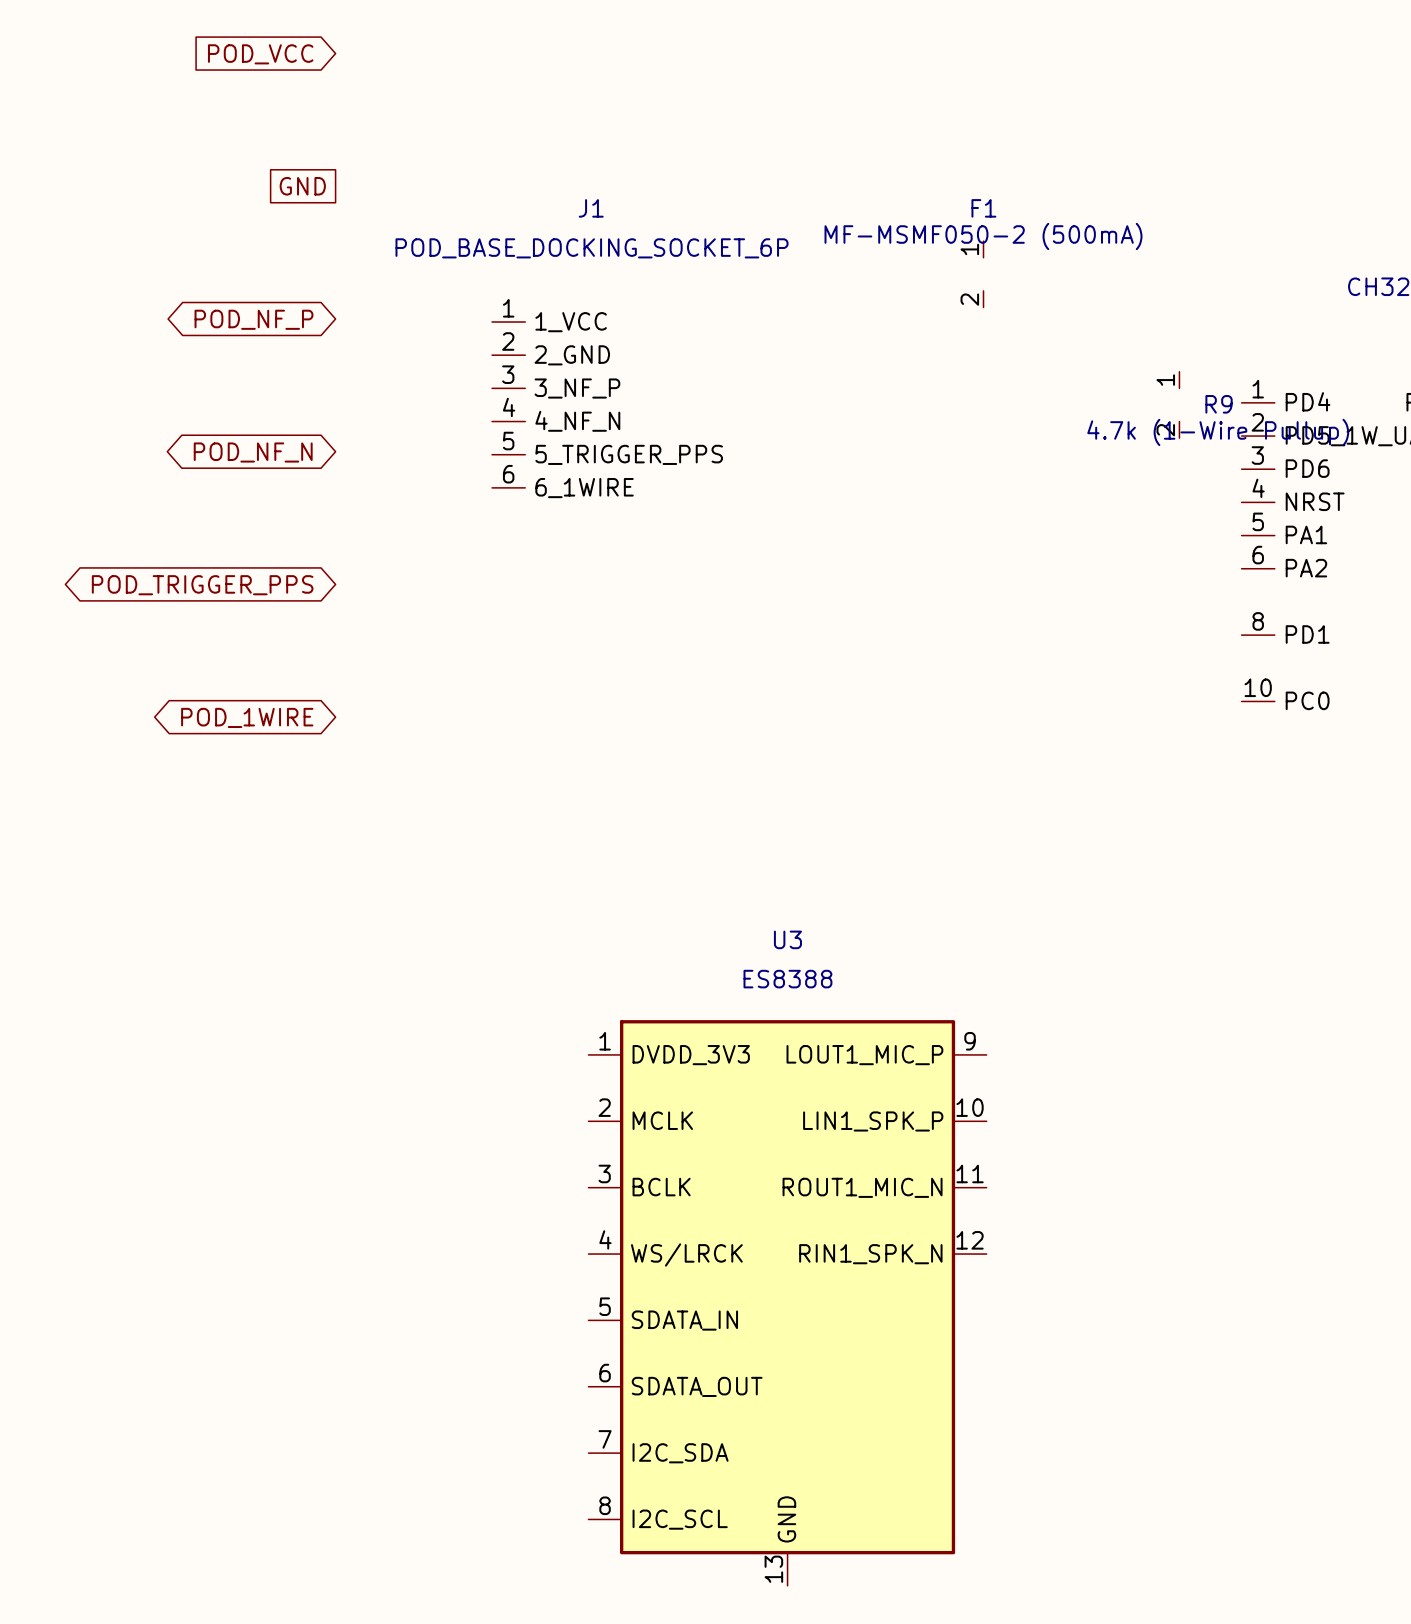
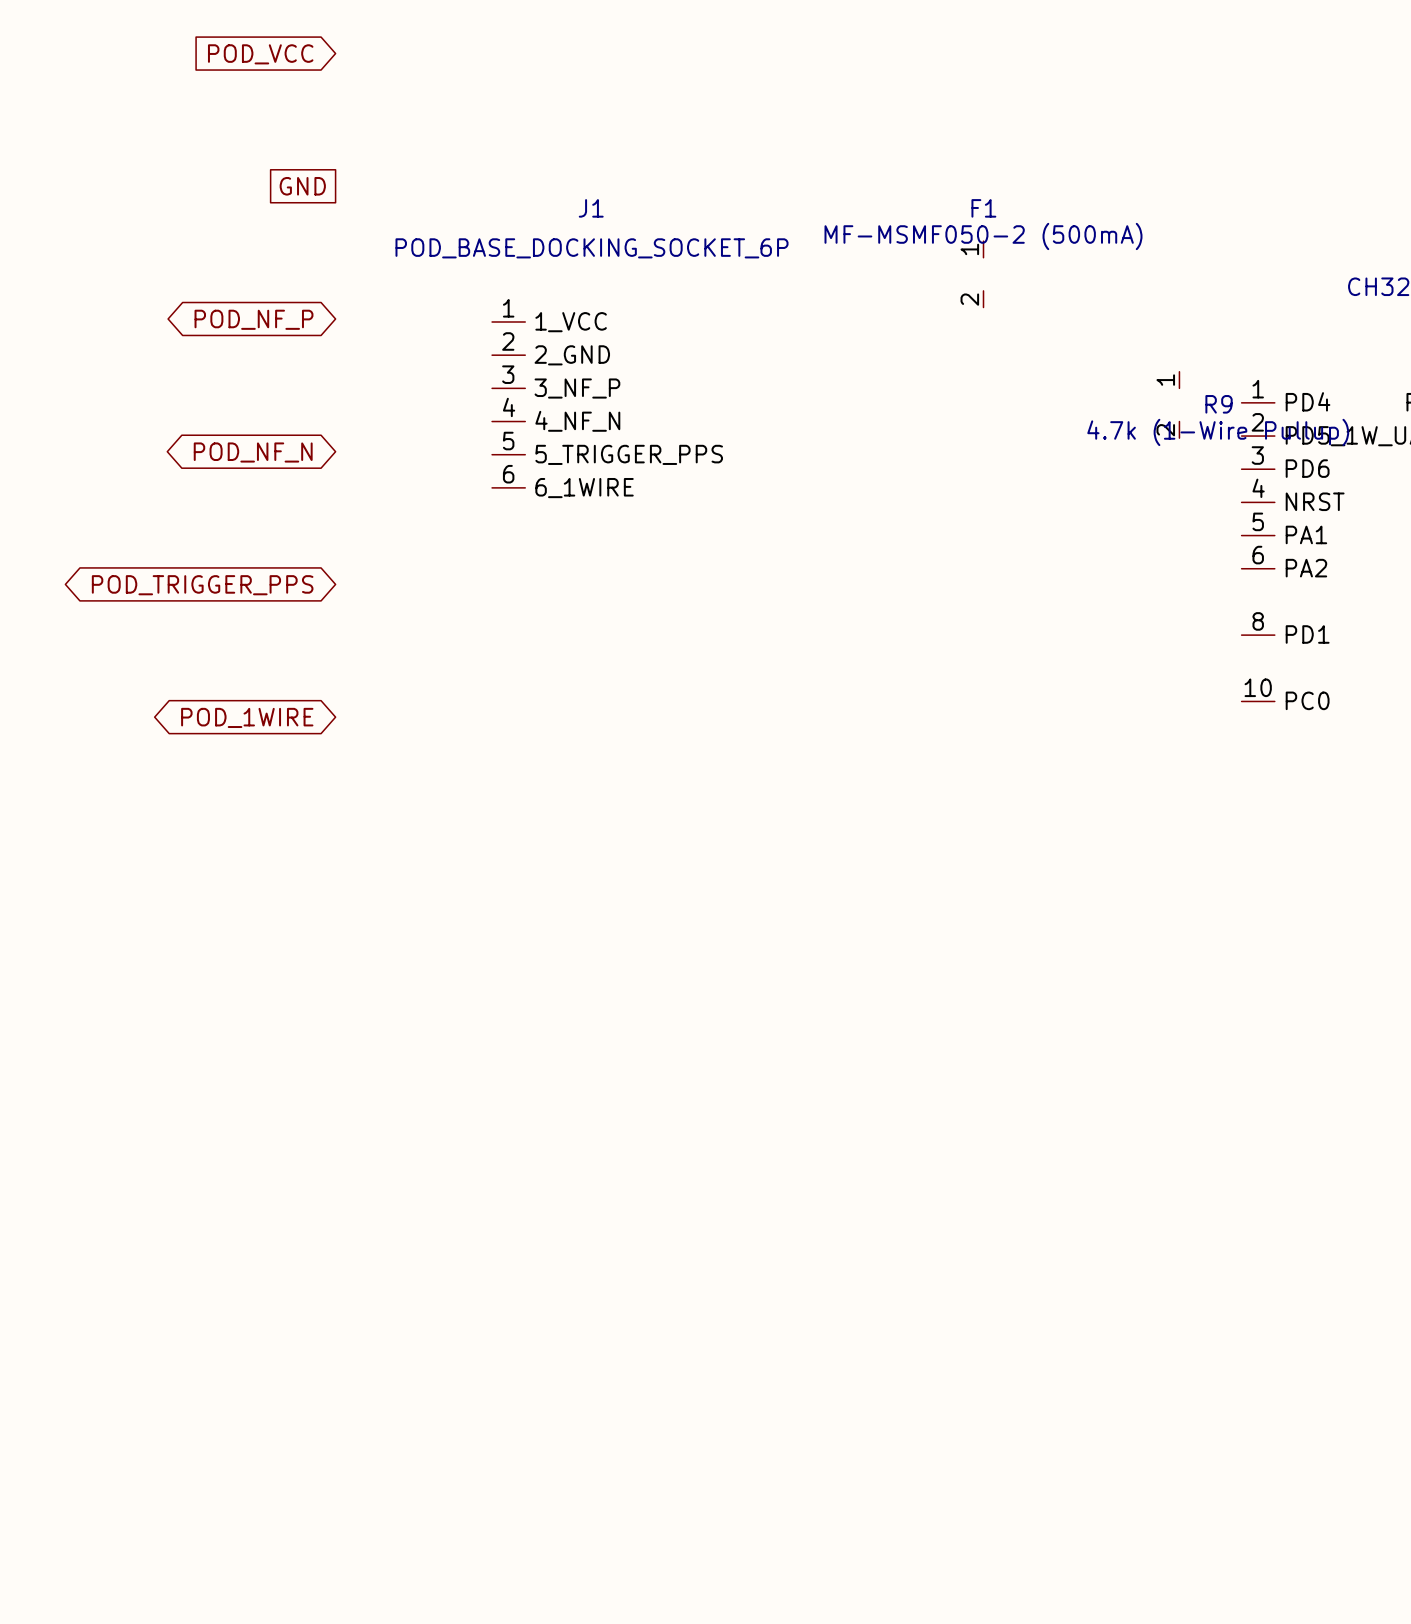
U3: ES8388 (787, 1302) -> none

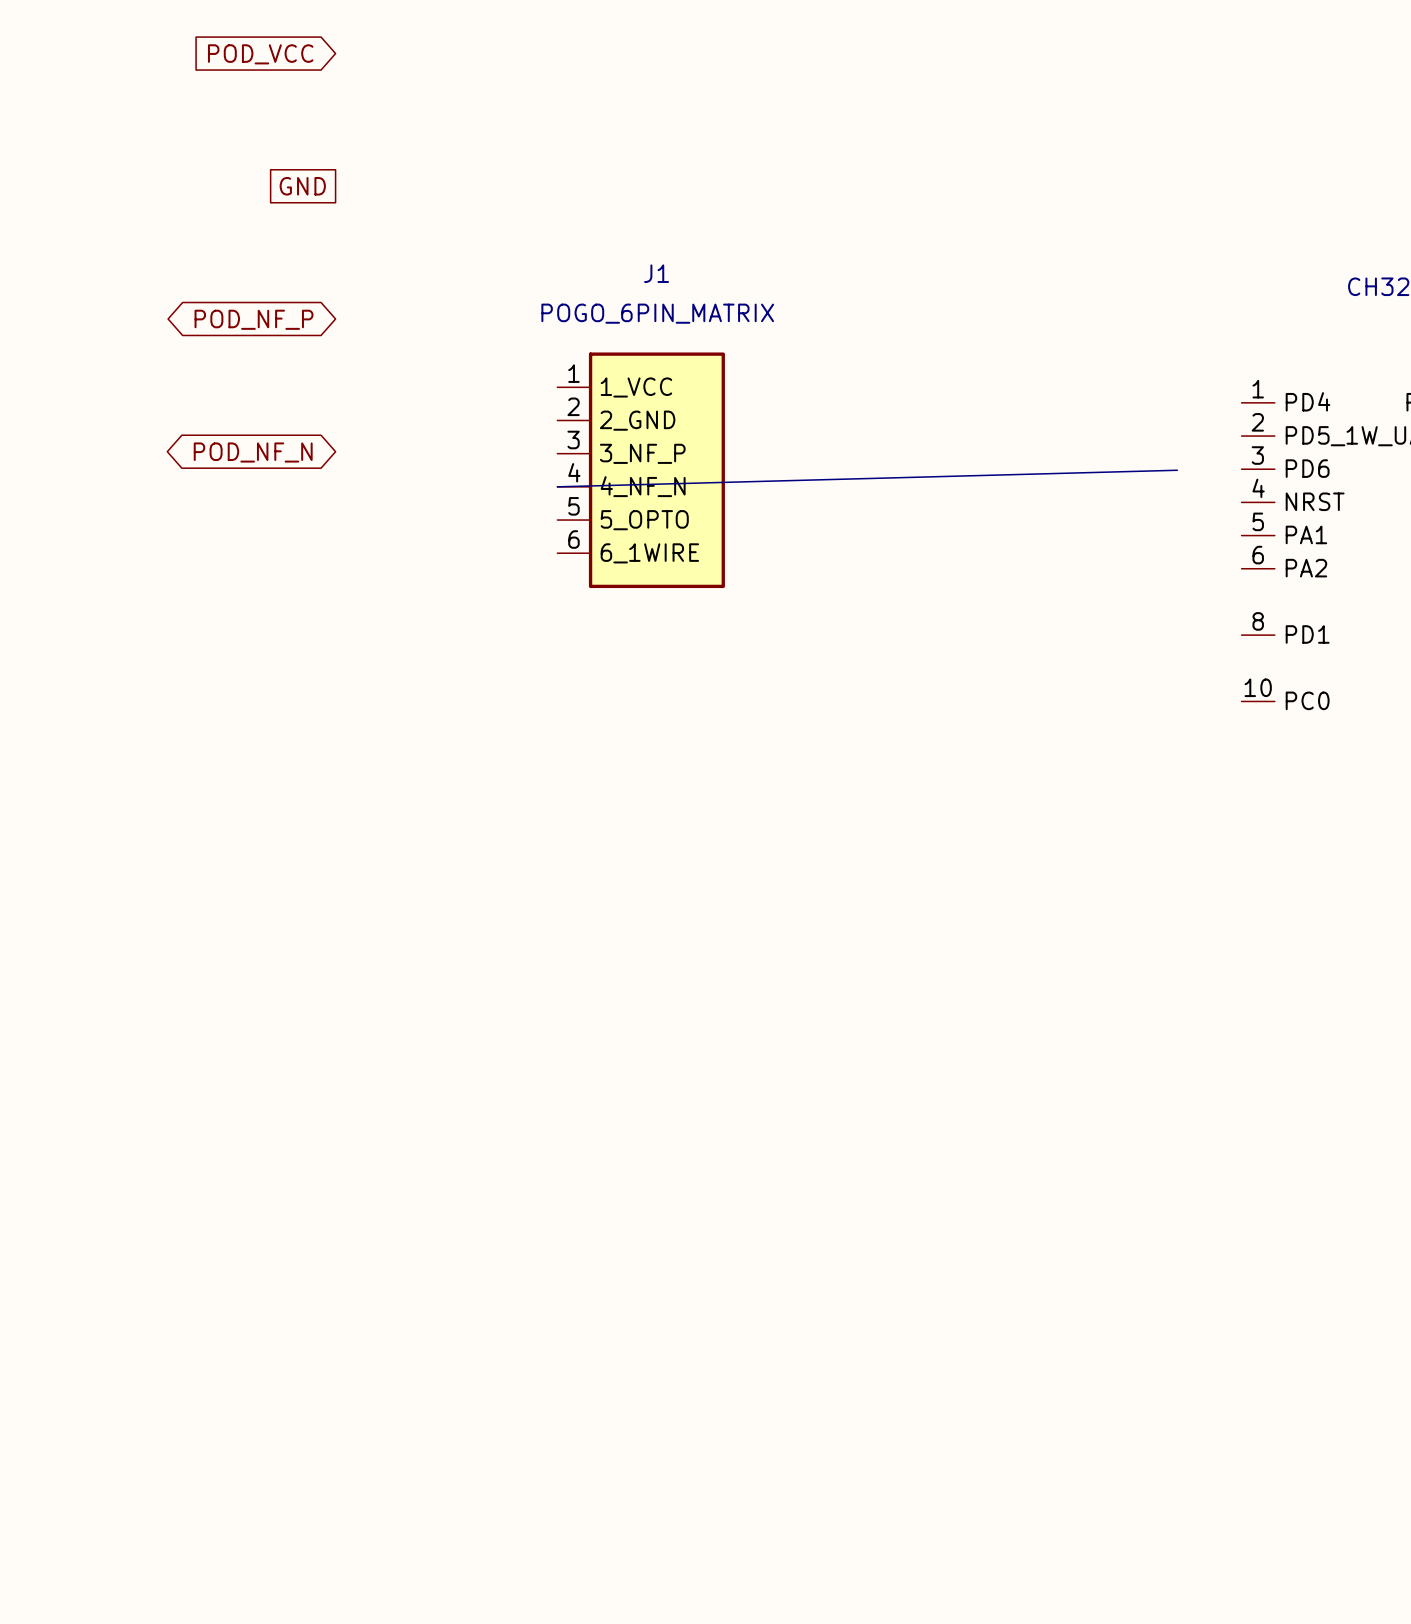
J1 name position: J1 (591, 208) -> J1 (656, 273)
J1 value: POD_BASE_DOCKING_SOCKET_6P (592, 248) -> POGO_6PIN_MATRIX (657, 313)
F1: MF-MSMF050-2 (500mA) (983, 274) -> none
J1 symbol: [492, 321, 526, 488] -> [557, 352, 725, 589]
R9: 4.7k (1-Wire Pullup) (1179, 404) -> none
wire: none -> (1177, 470) (557, 486)
global label: POD_TRIGGER_PPS (202, 585) -> none
global label: POD_1WIRE (247, 717) -> none

